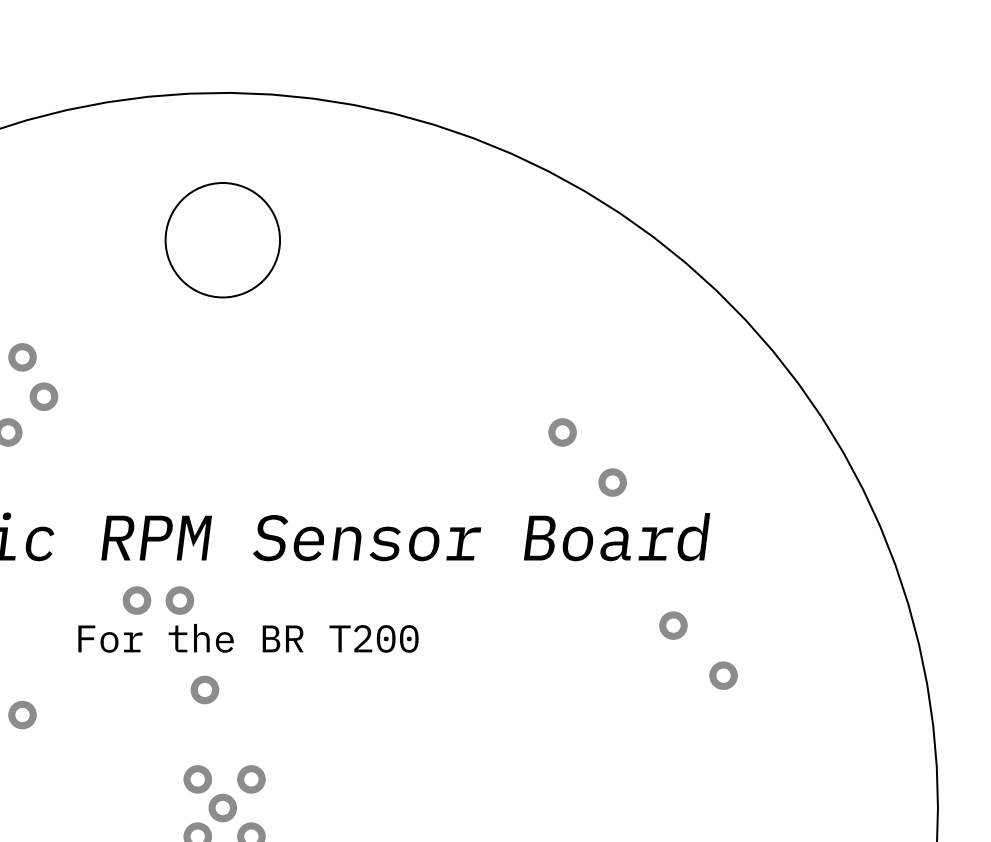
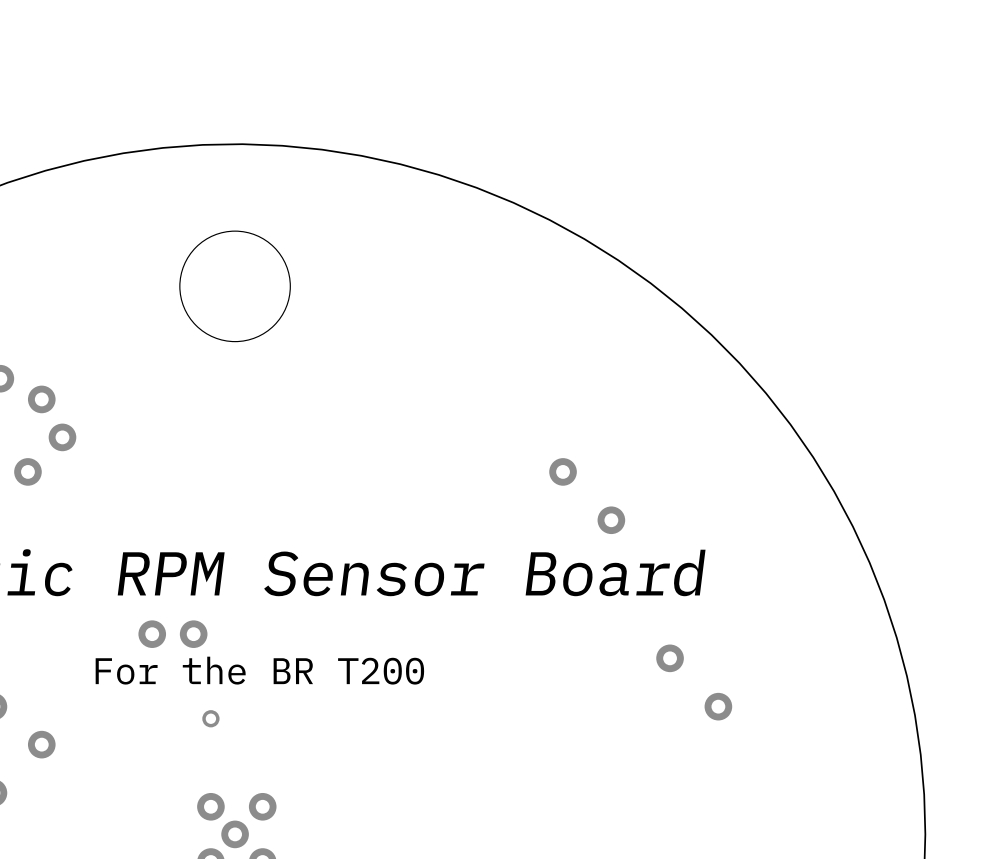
via size: [190, 675, 220, 705] -> [202, 710, 220, 728]

